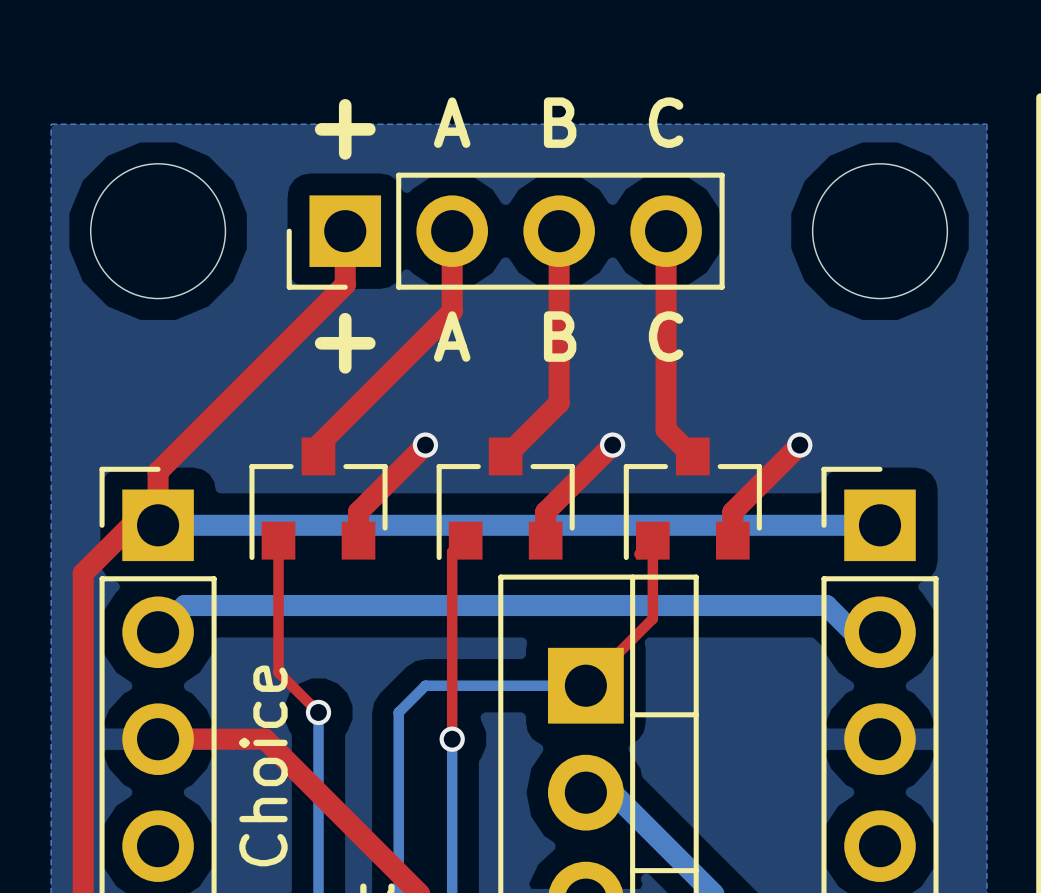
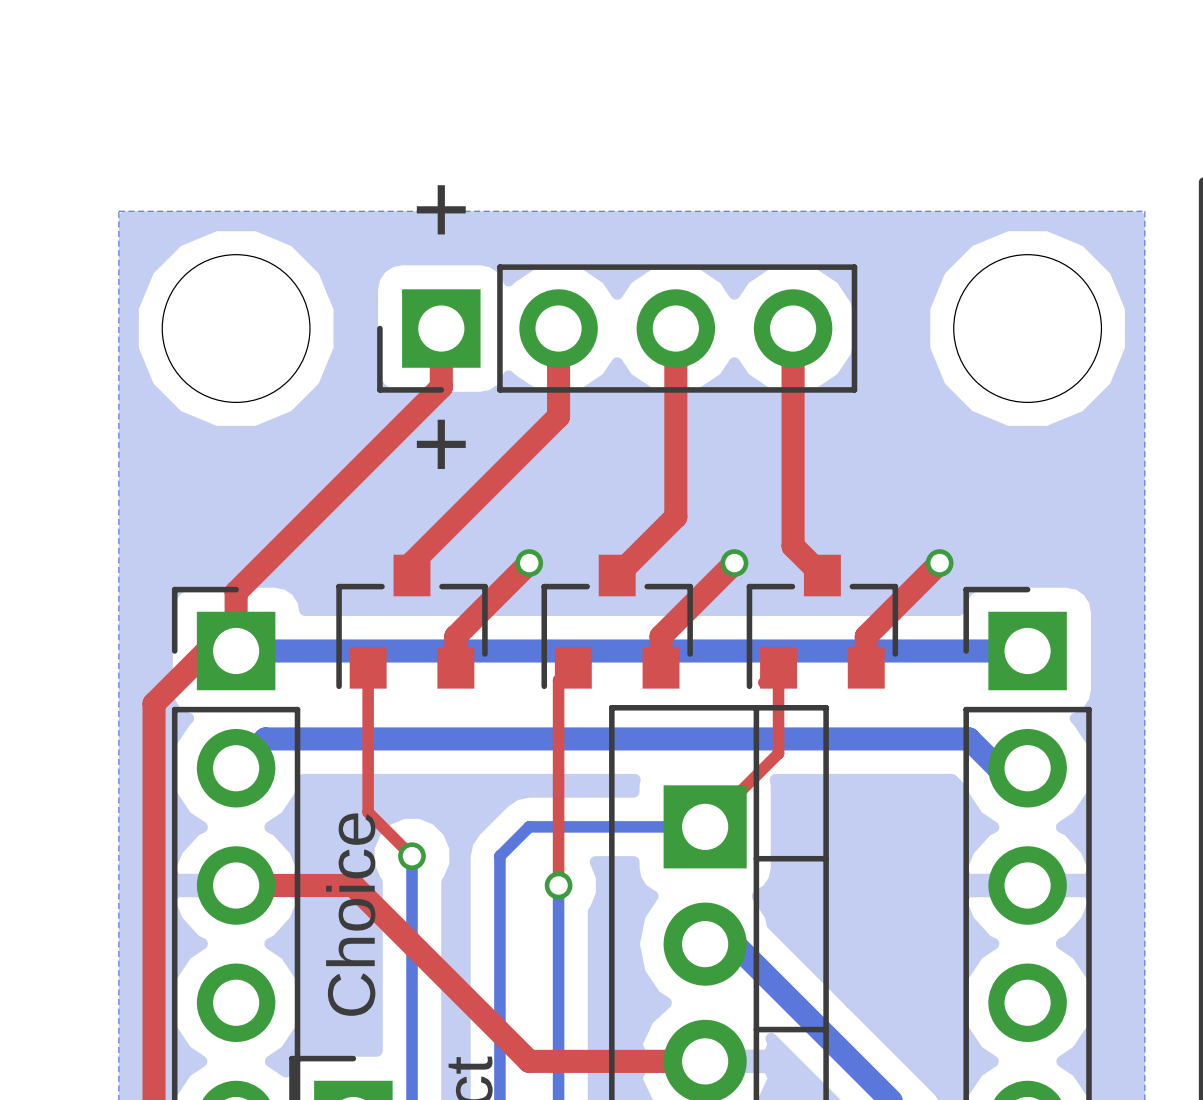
text: A (452, 122) -> none
text: B (560, 122) -> none
text: C (666, 122) -> none
text: A (452, 336) -> none
text: B (560, 336) -> none
text: C (666, 336) -> none

